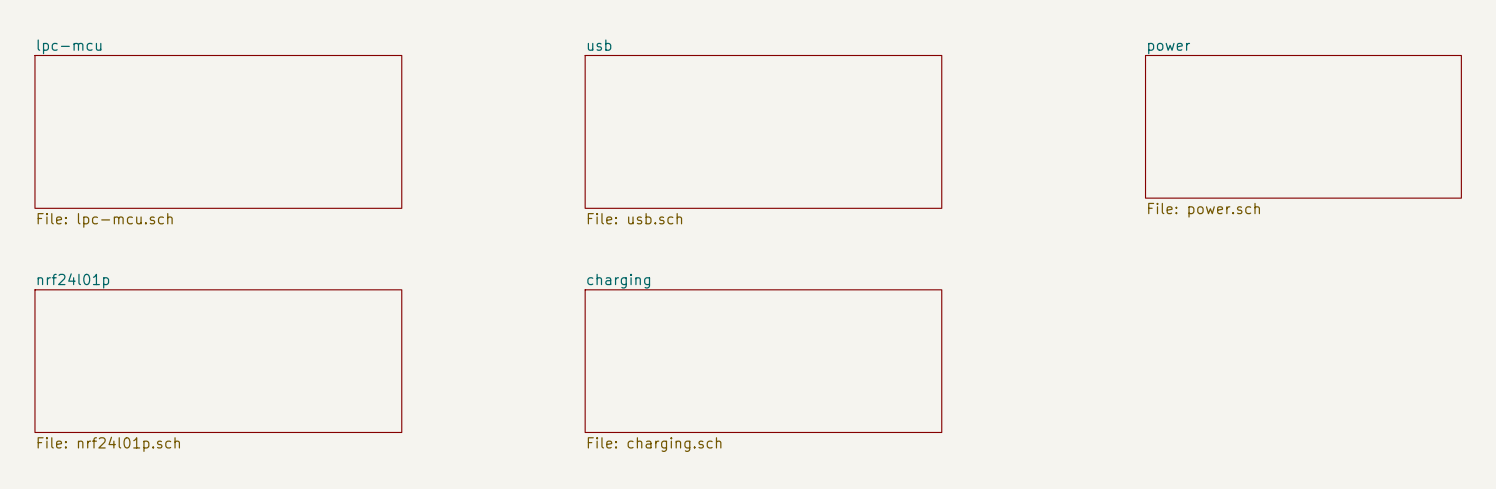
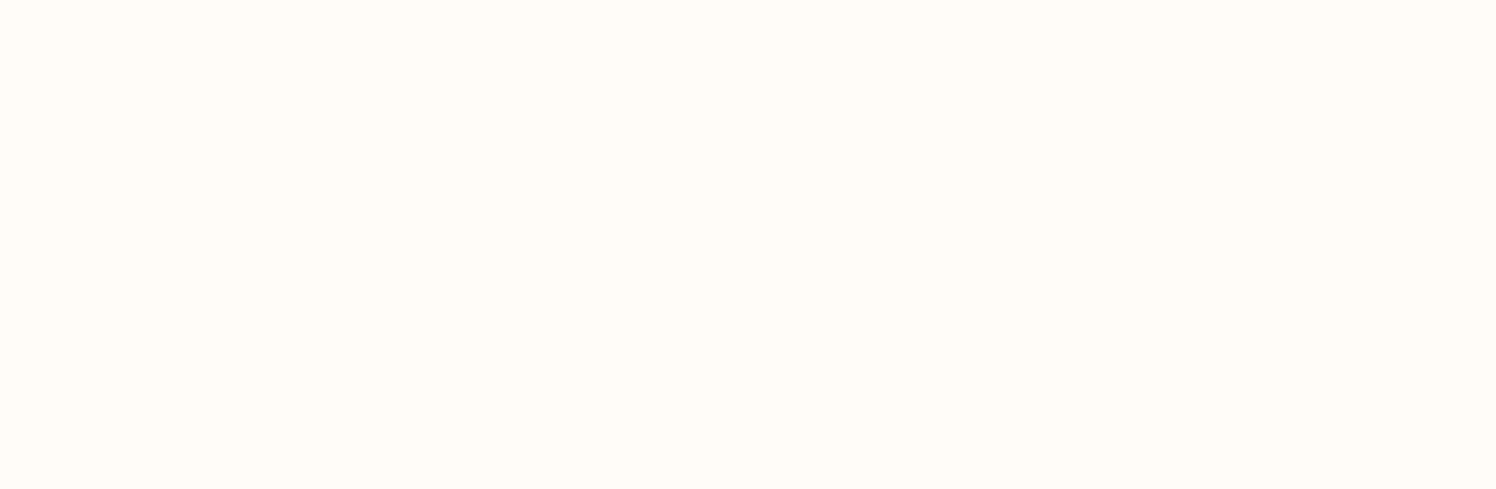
sheet power: File: power.sch (1303, 126) -> none
sheet lpc-mcu: File: lpc-mcu.sch (218, 131) -> none
sheet usb: File: usb.sch (763, 131) -> none
sheet nrf24l01p: File: nrf24l01p.sch (218, 361) -> none
sheet charging: File: charging.sch (763, 361) -> none

